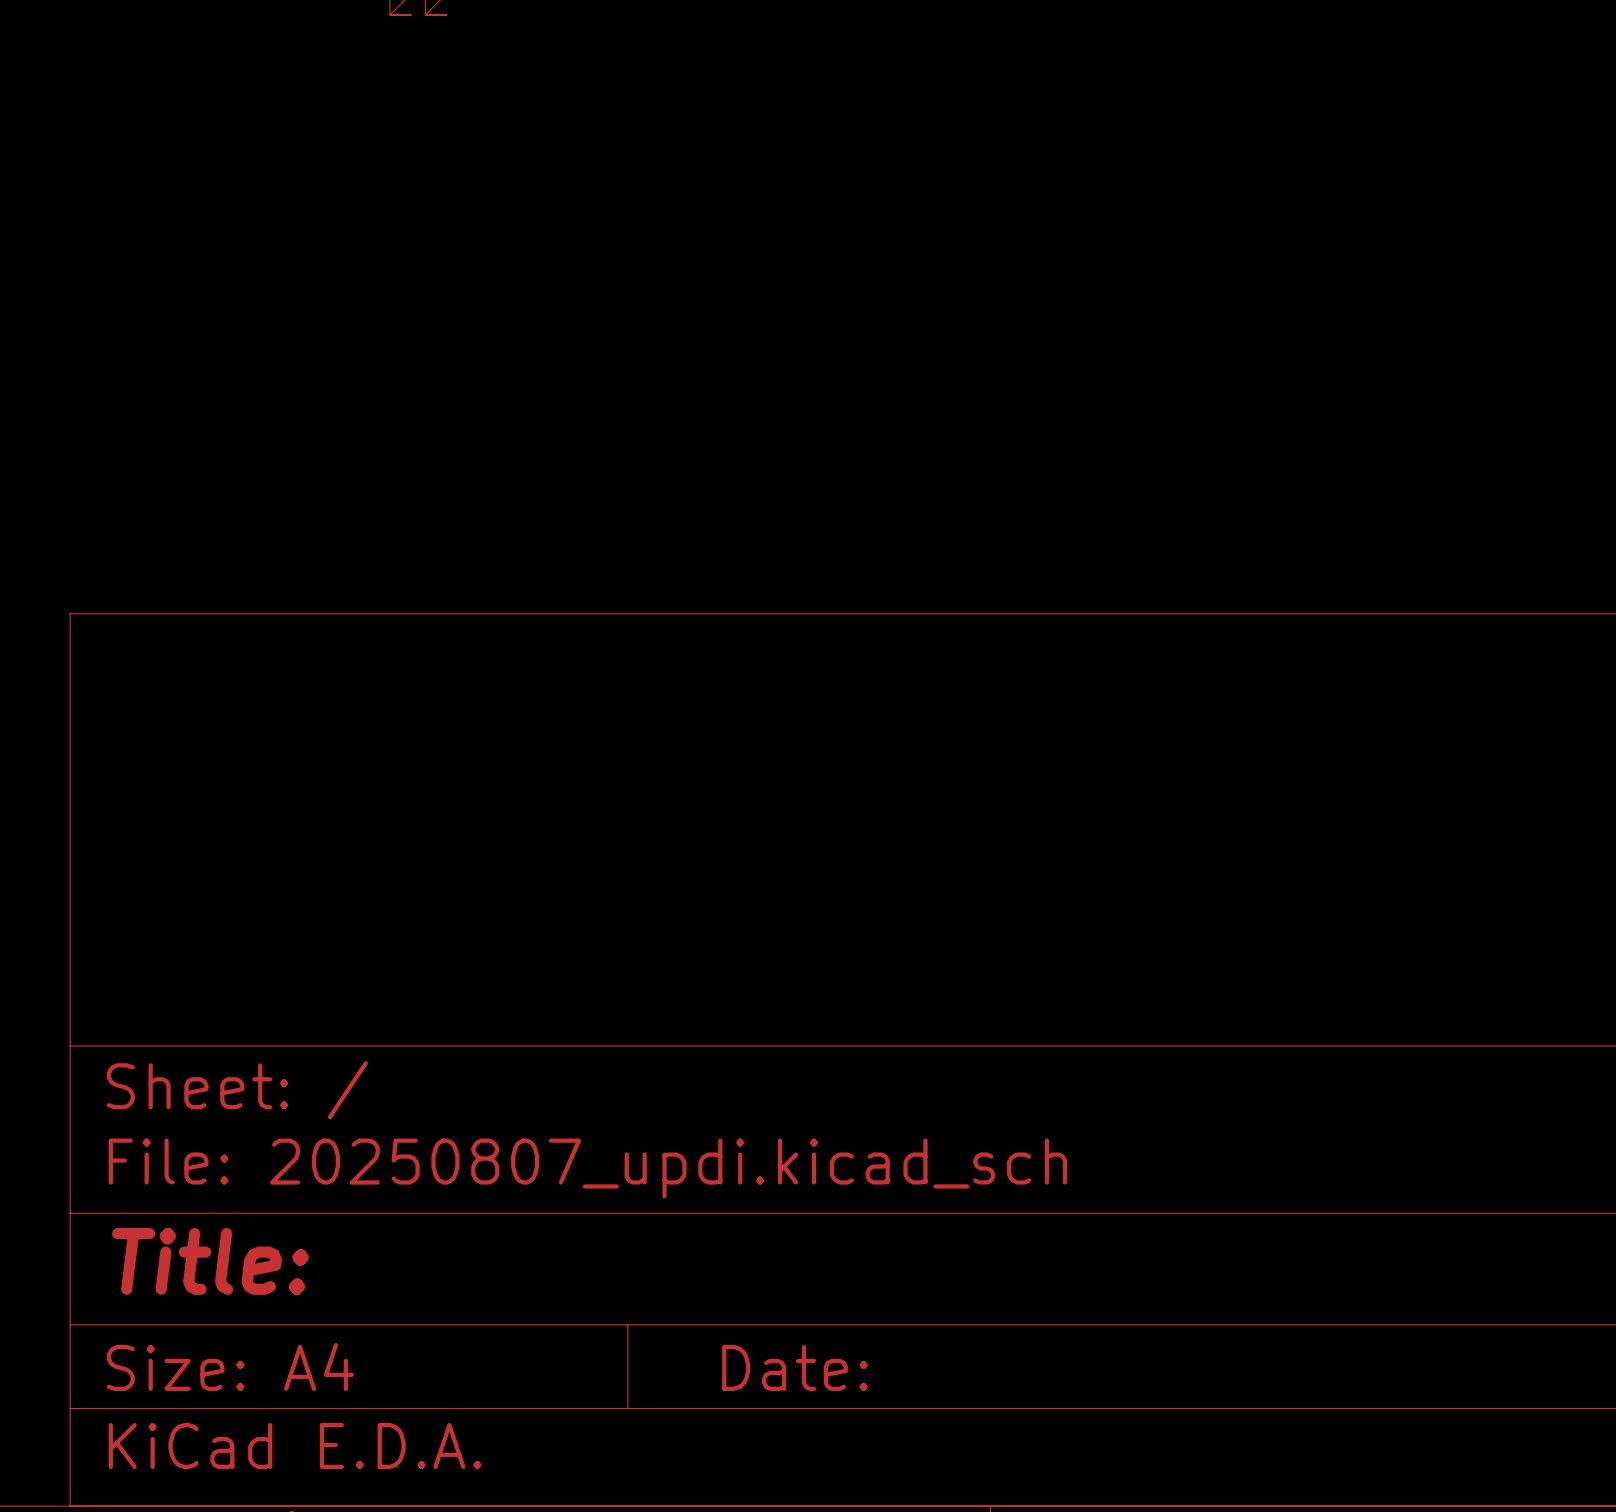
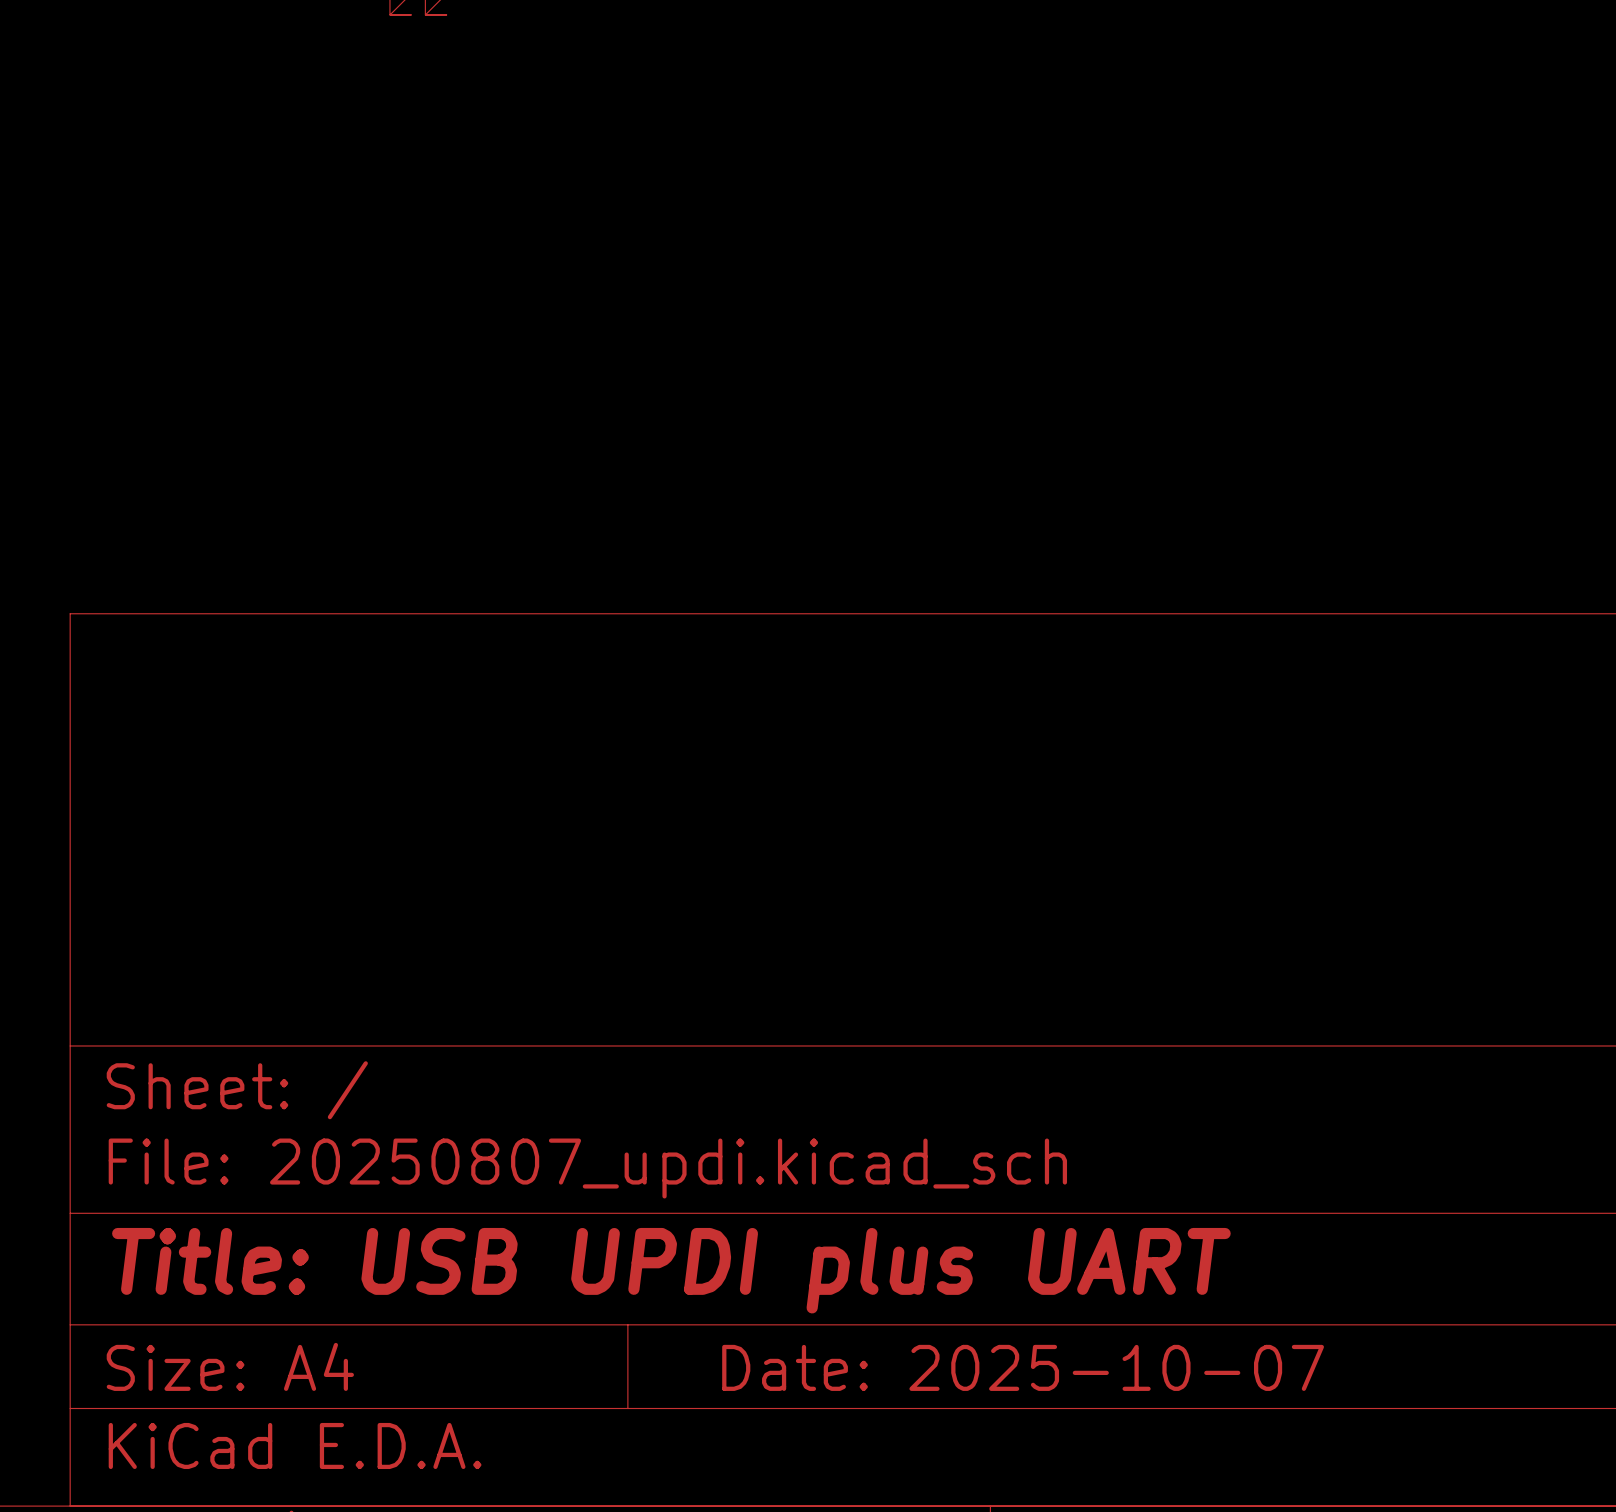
title block: Title: (210, 1261) -> Title: USB UPDI plus UART (671, 1270)
title block: Date: (795, 1367) -> Date: 2025-10-07 (1023, 1367)

